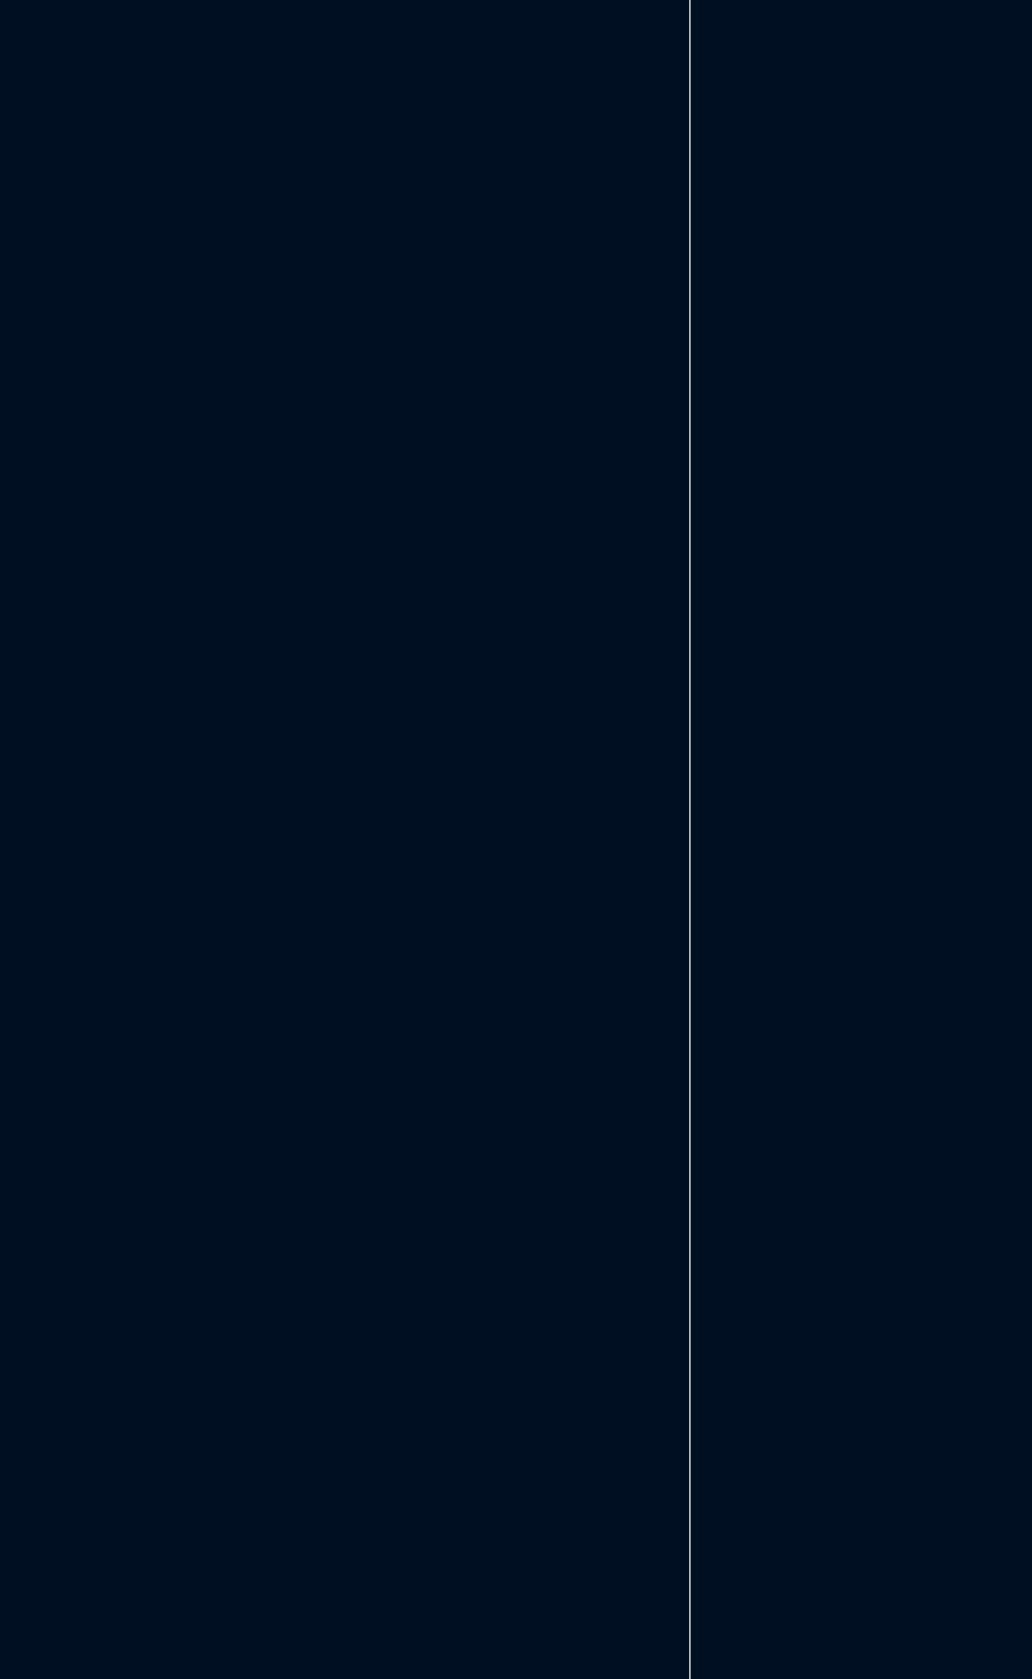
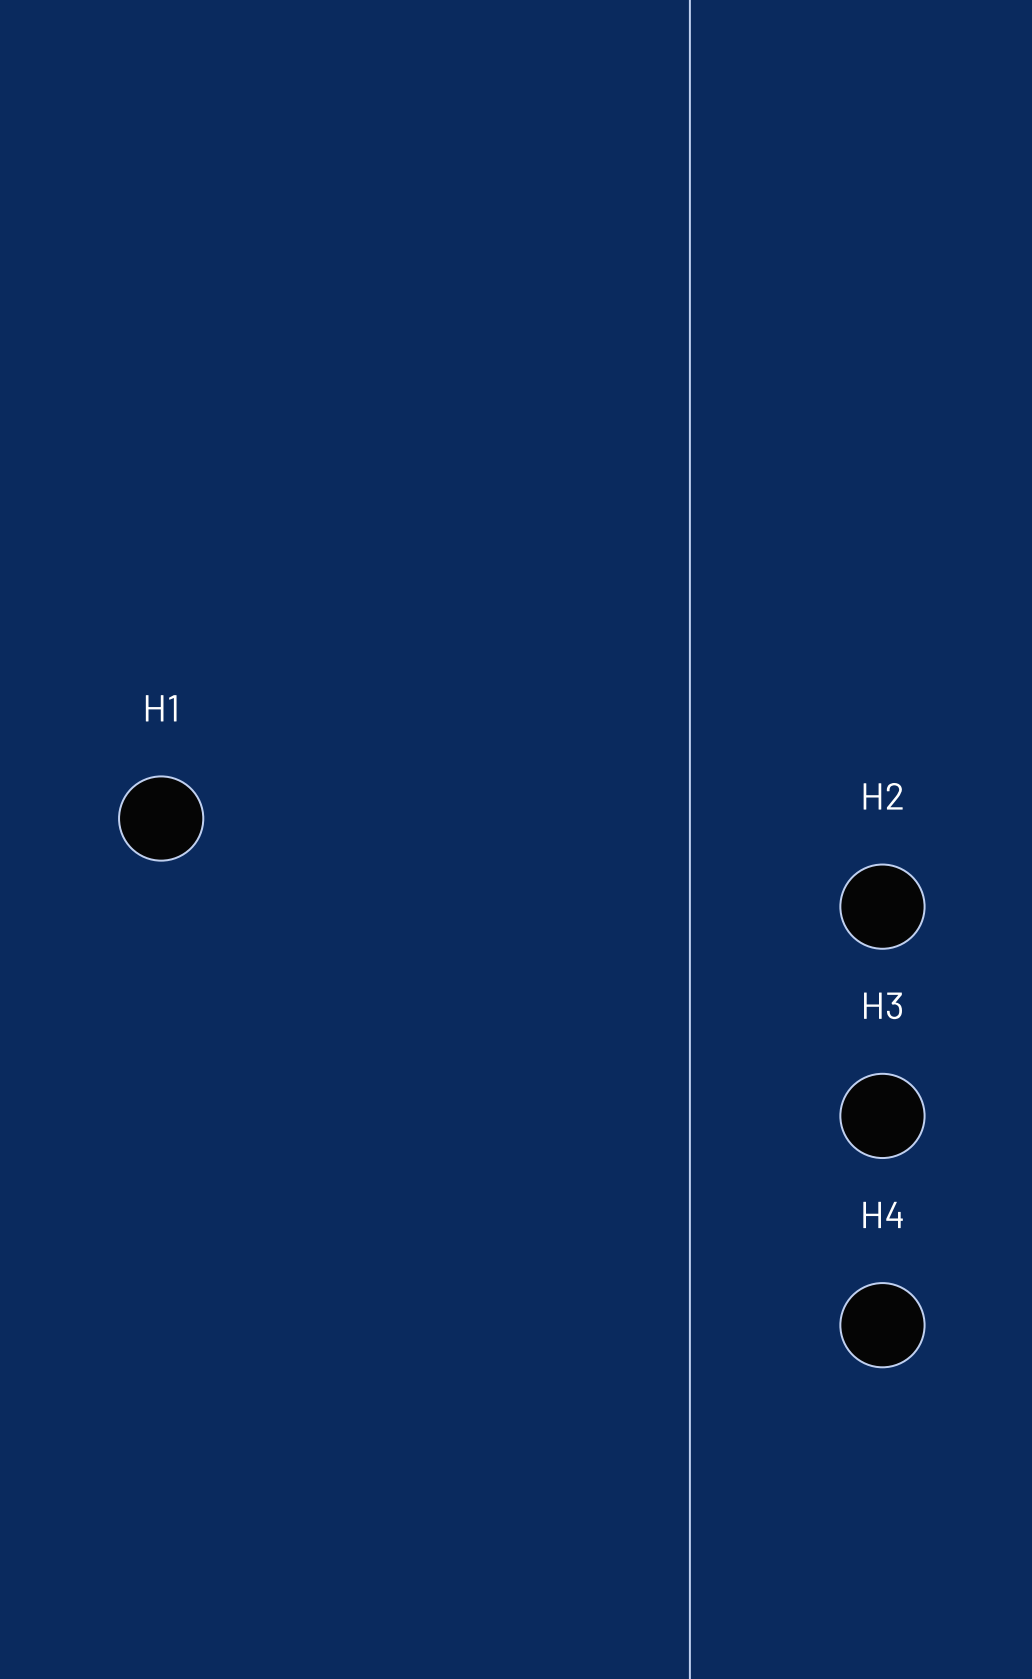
H1: none -> (161, 818)
H2: none -> (882, 906)
H3: none -> (882, 1115)
H4: none -> (882, 1325)

